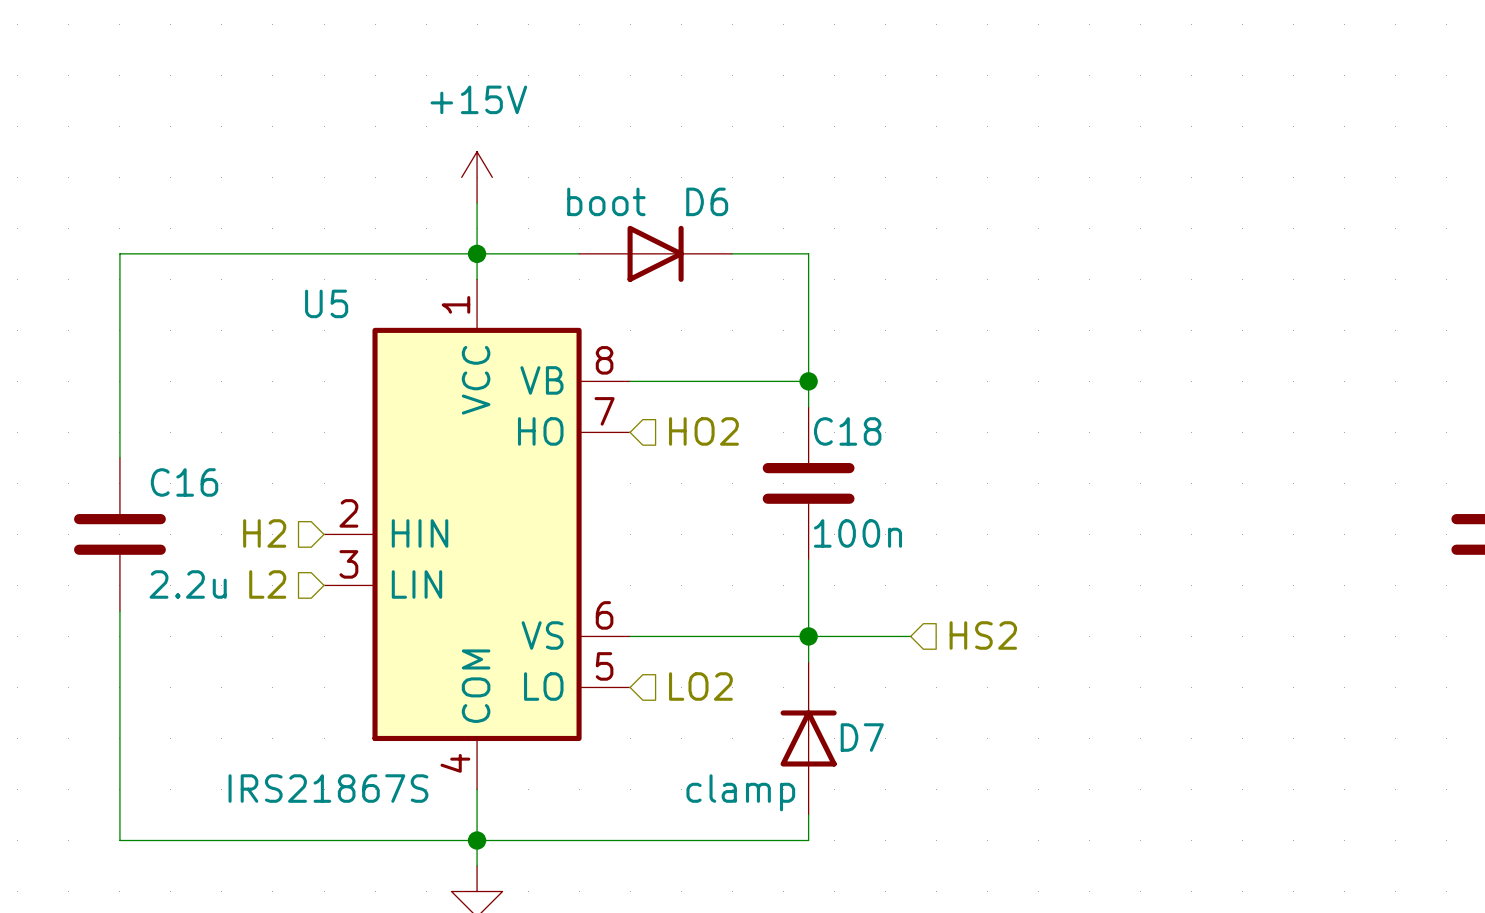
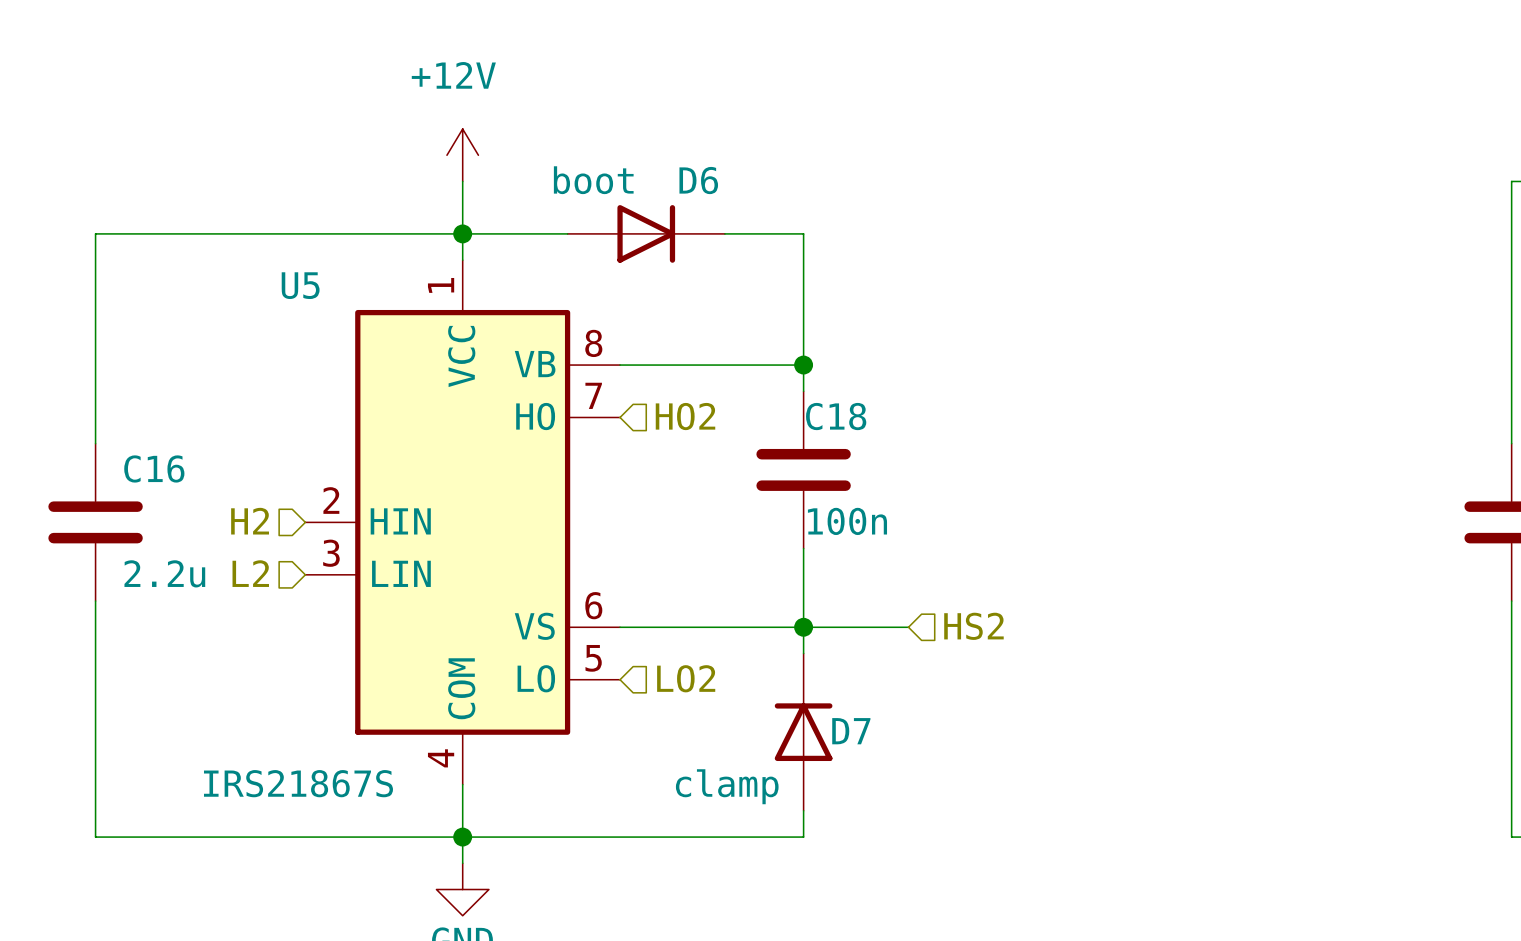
power symbol: +15V (477, 177) -> +12V (462, 155)

